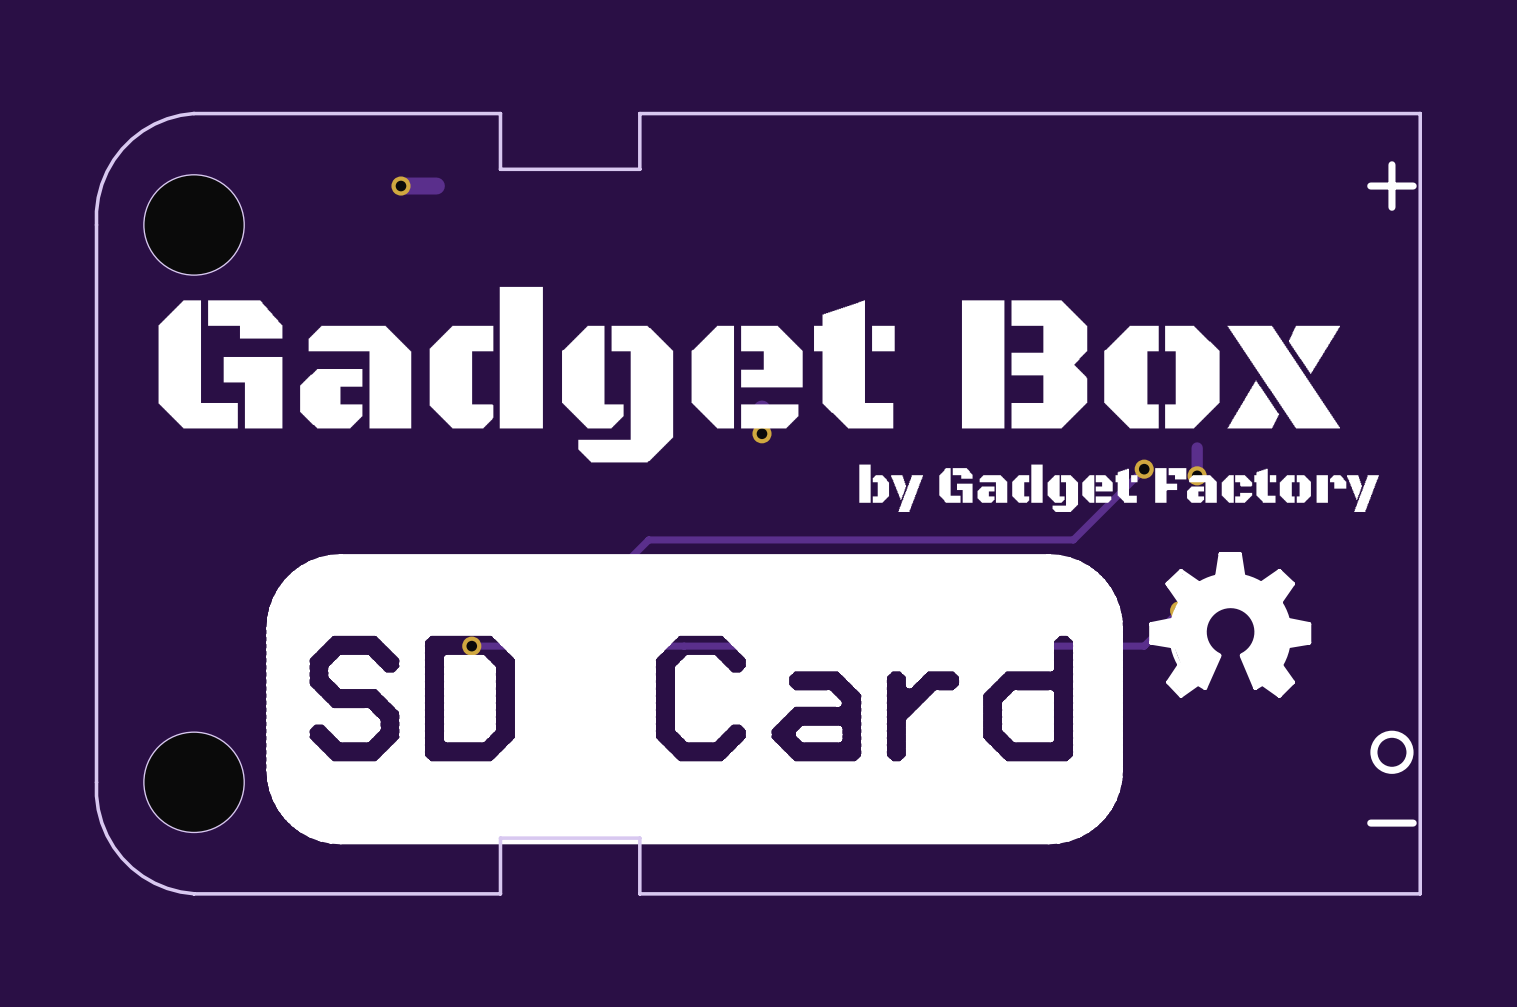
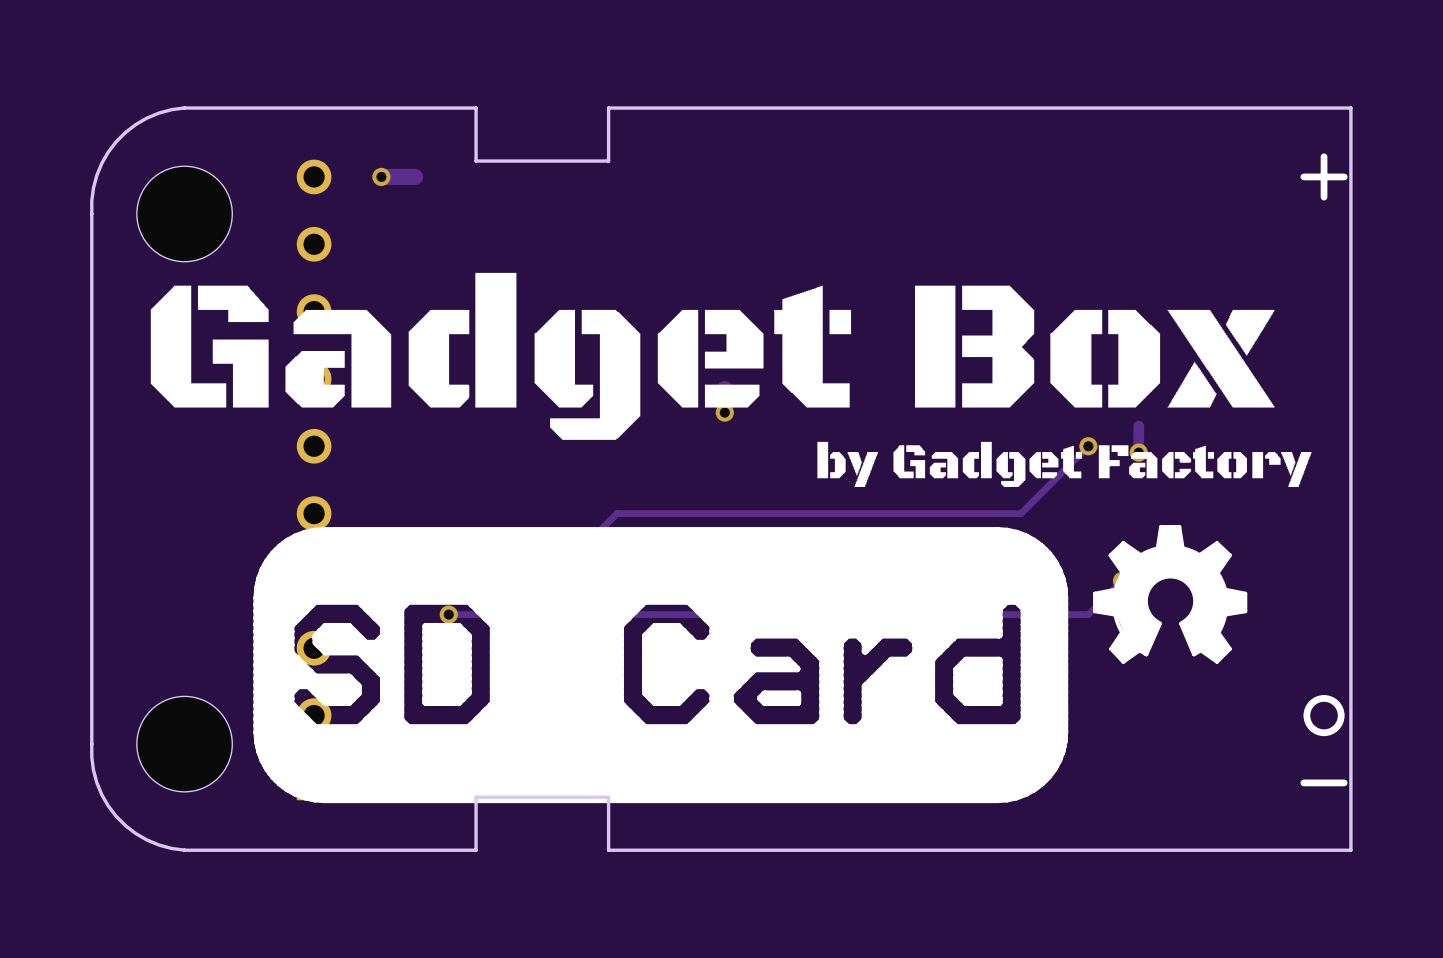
part footprint: [94, 111, 1422, 896] -> [90, 106, 1353, 852]

